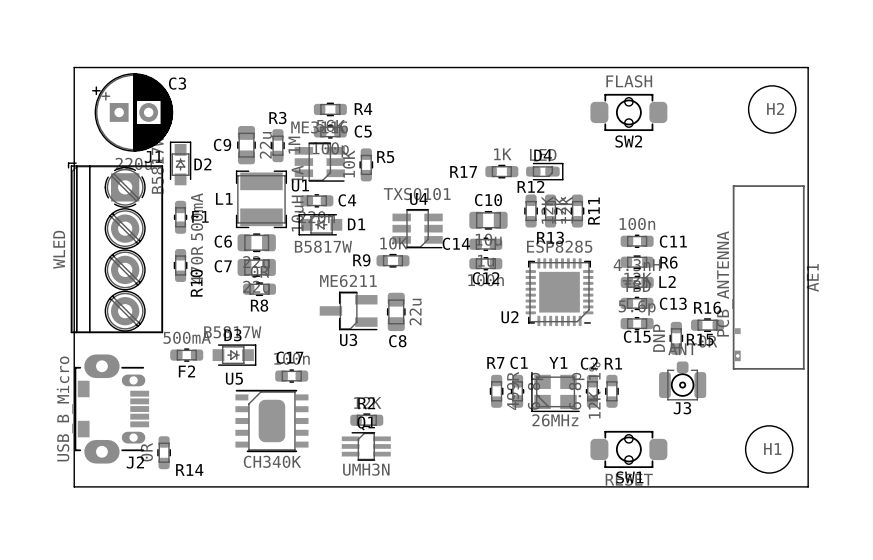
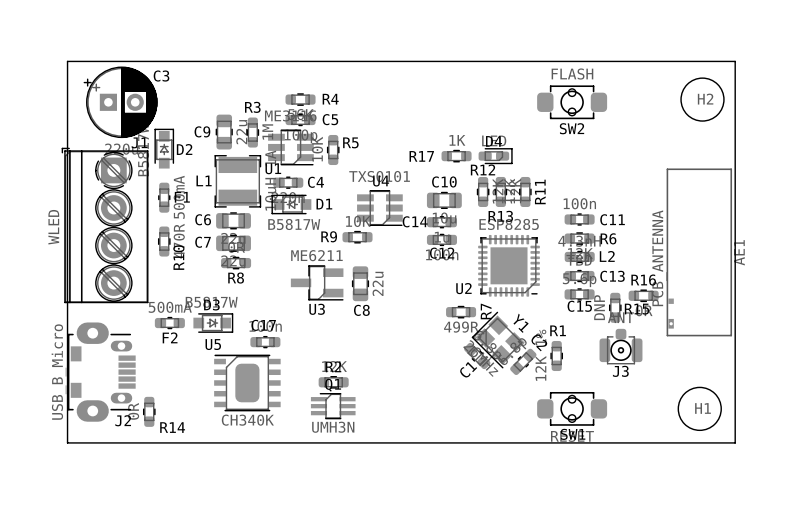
C1 name position: C1 (519, 362) -> C1 (468, 369)
R7 rotation: 0° (496, 391) -> 90° clockwise (461, 312)
R7 position: (496, 391) -> (461, 312)
C1 rotation: 0° (517, 391) -> 45° counterclockwise (477, 356)
Y1 rotation: 0° (555, 391) -> 45° clockwise (498, 340)
C2 rotation: 0° (592, 391) -> 45° clockwise (523, 361)

